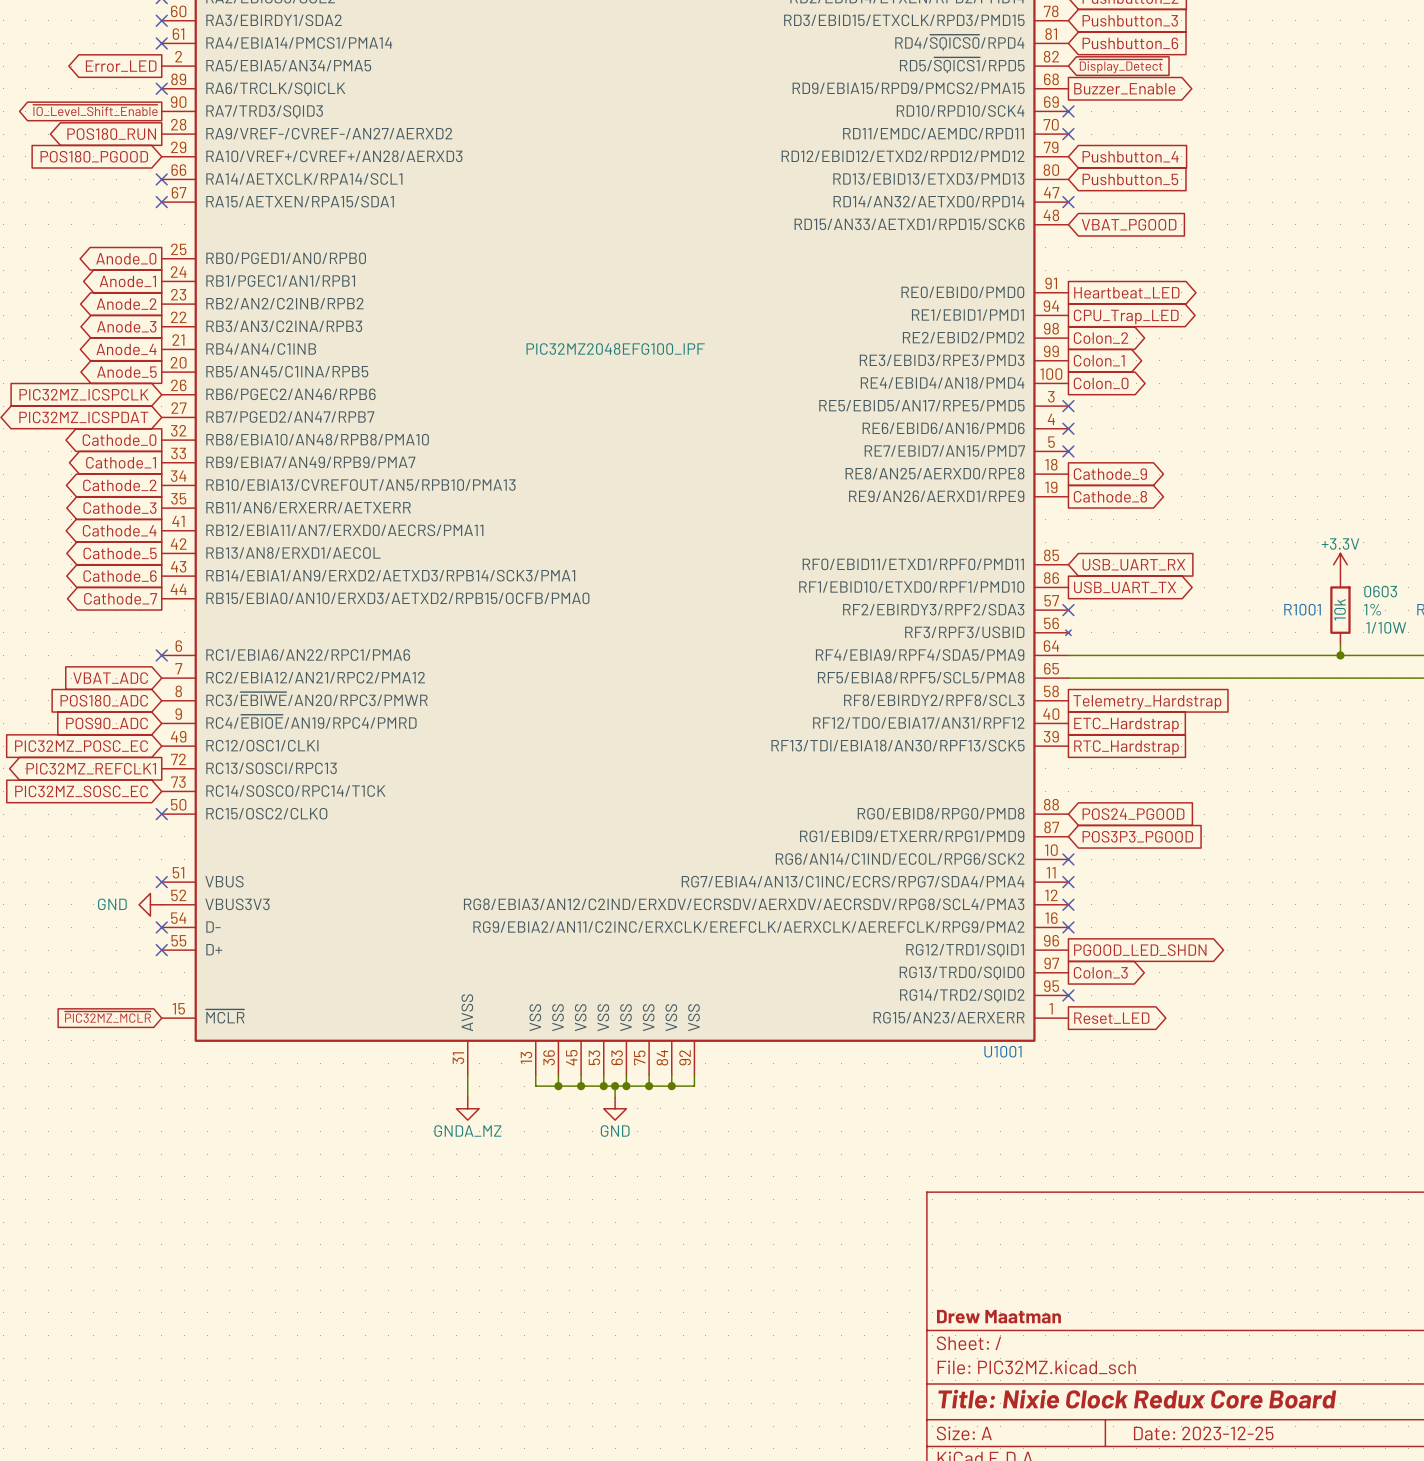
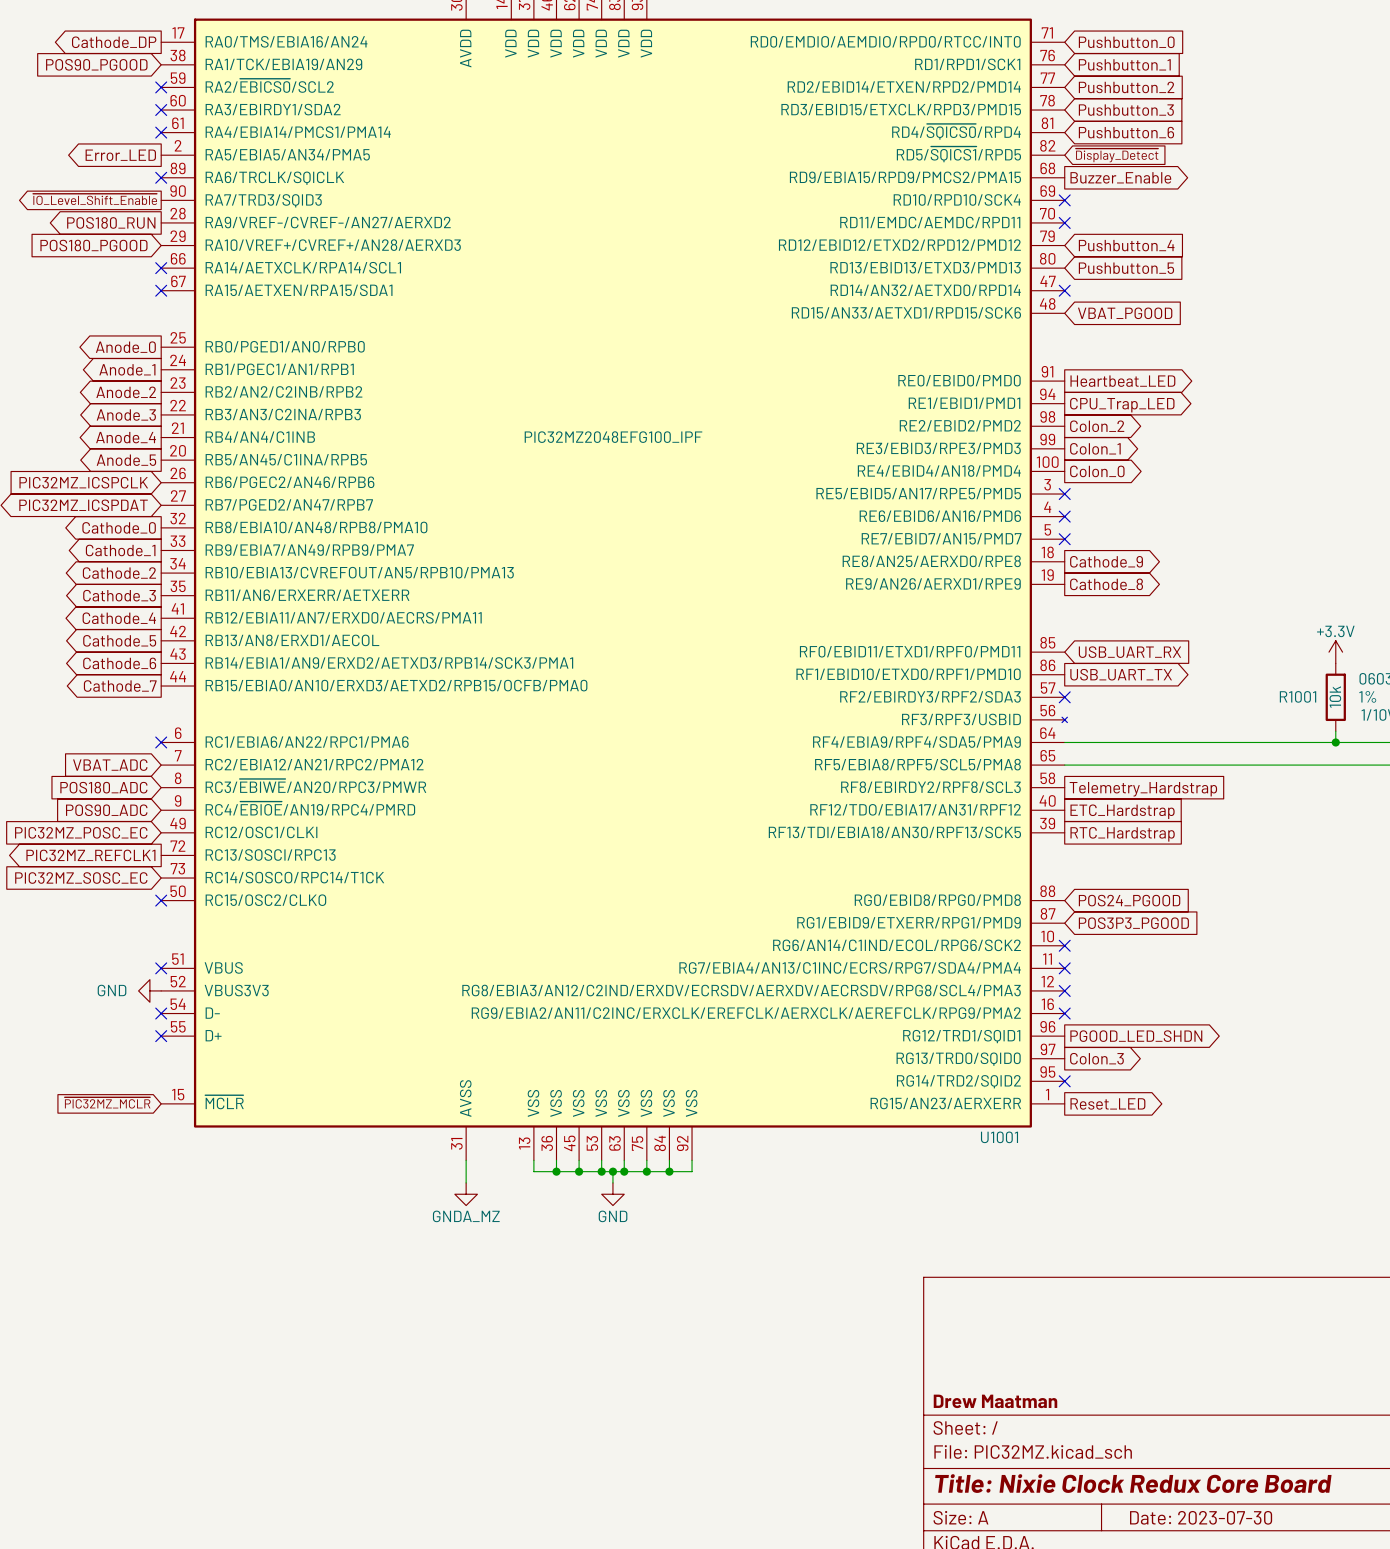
title block: Date: 2023-12-25 (1203, 1433) -> Date: 2023-07-30 (1201, 1517)

